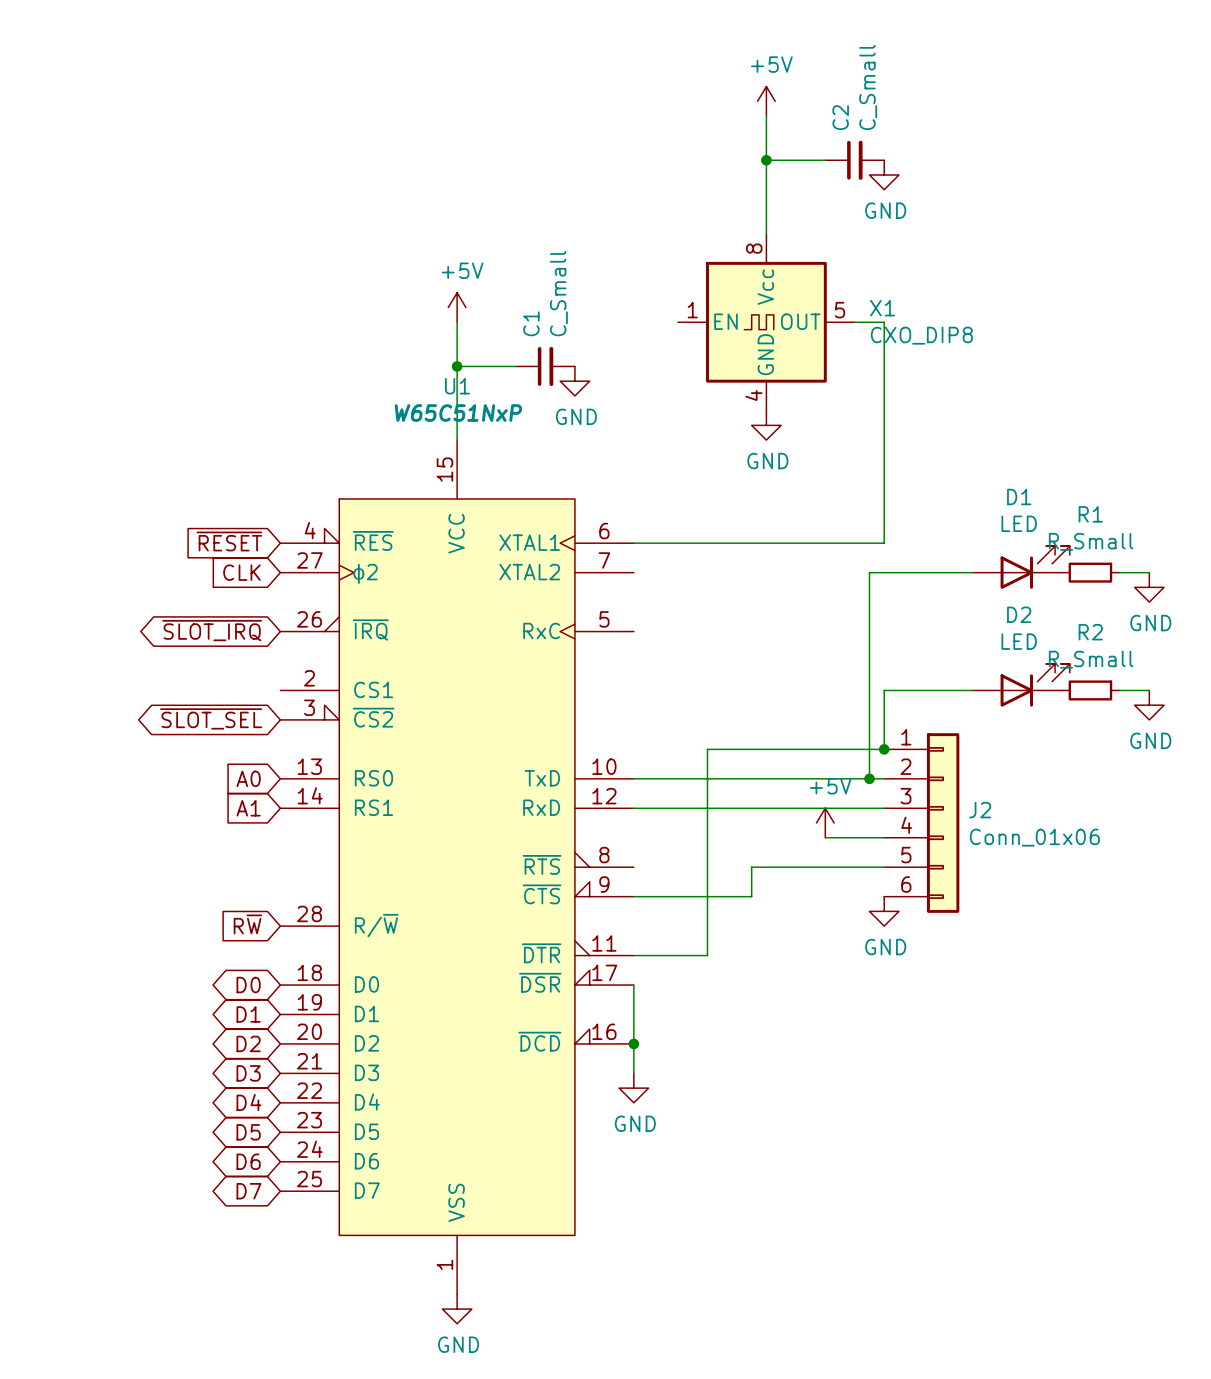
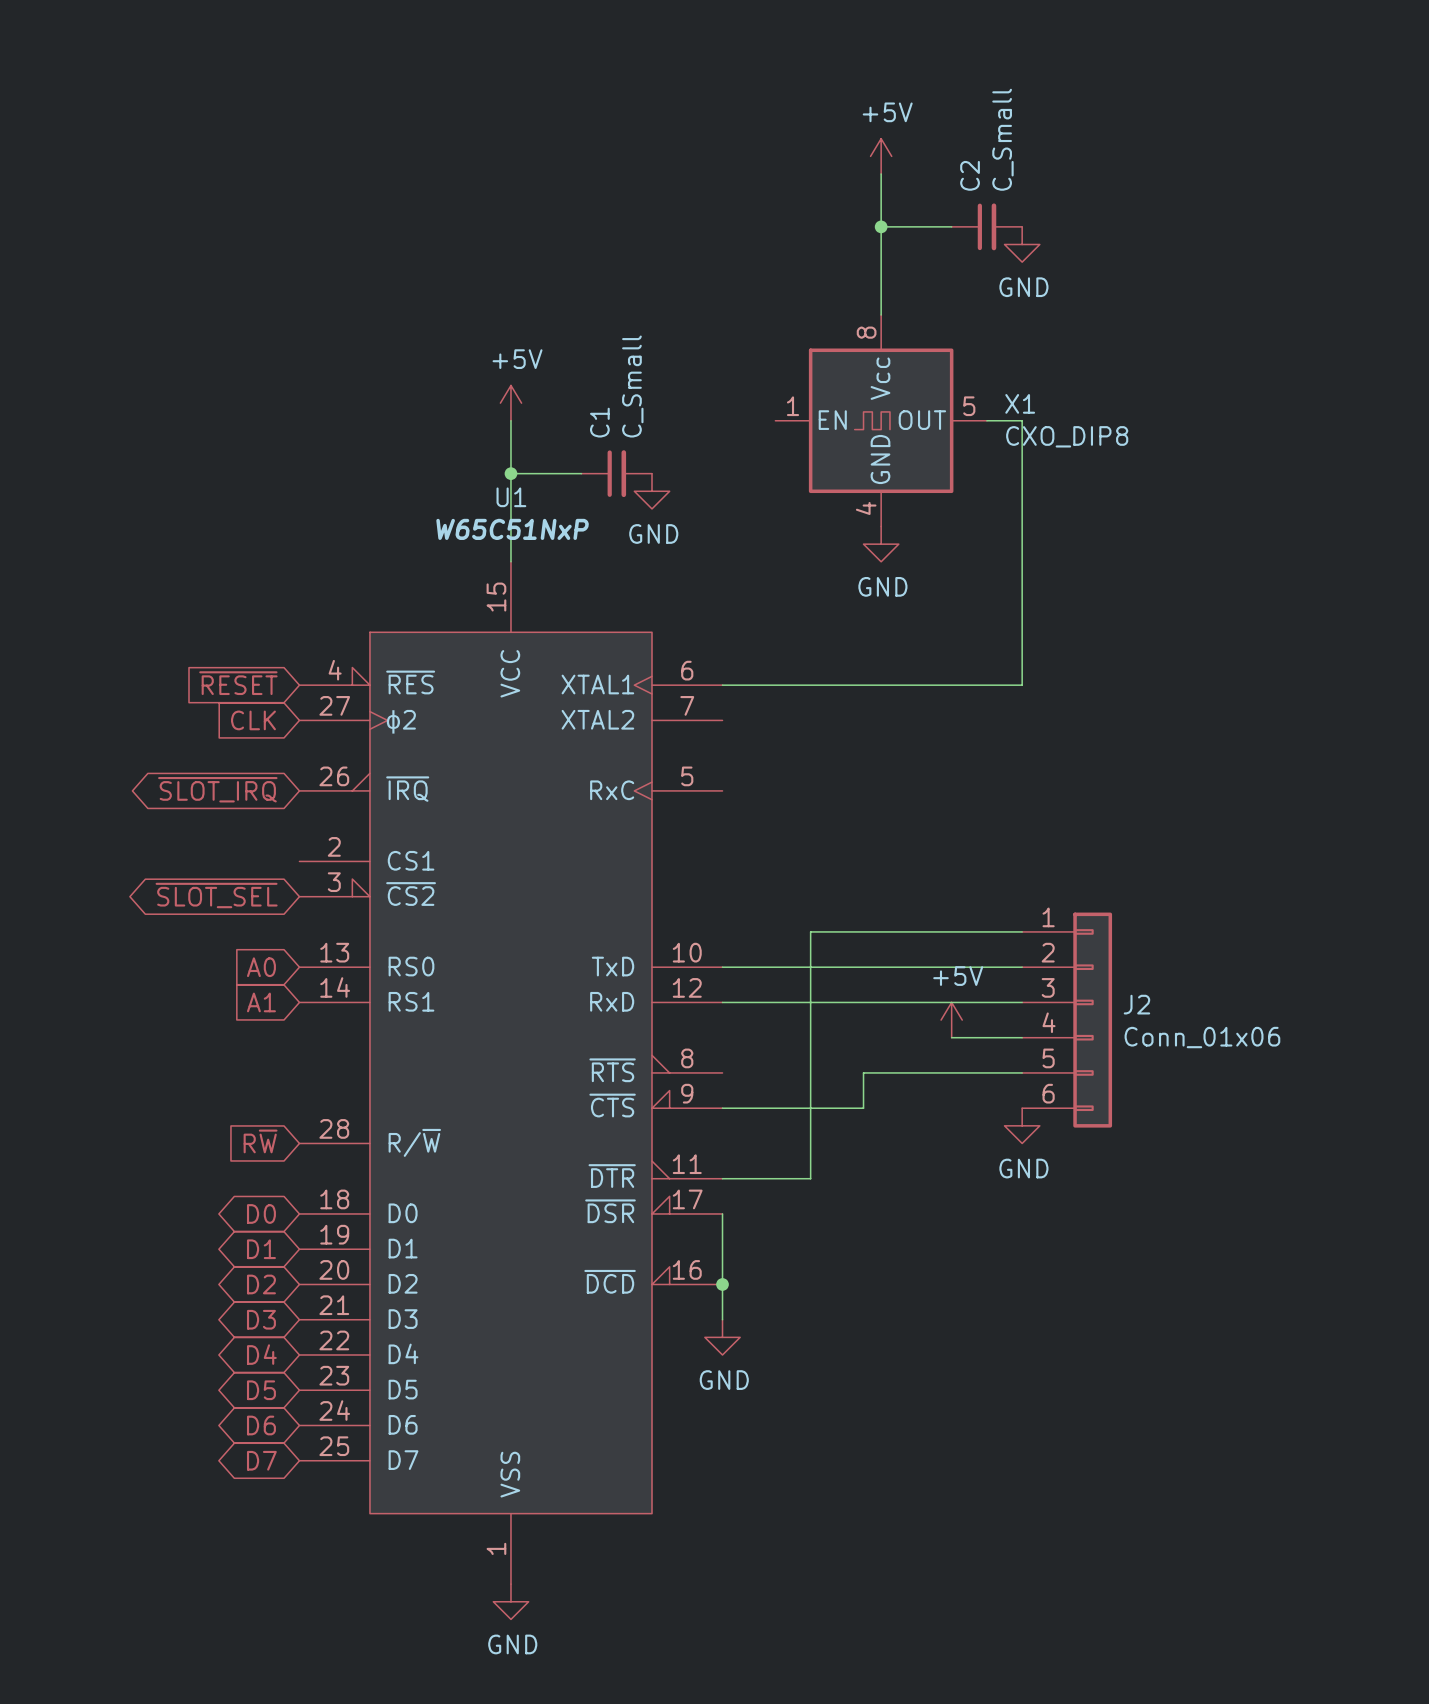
D1: LED (1021, 567) -> none
wire: (972, 572) (869, 572) (869, 778) -> none
R1: R_Small (1090, 572) -> none
wire: (1119, 572) (1149, 572) -> none
power symbol: GND (1149, 587) -> none
D2: LED (1021, 685) -> none
wire: (972, 690) (884, 690) (884, 749) -> none
R2: R_Small (1090, 690) -> none
wire: (1119, 690) (1149, 690) -> none
power symbol: GND (1149, 705) -> none
junction: (884, 749) -> none
junction: (869, 778) -> none

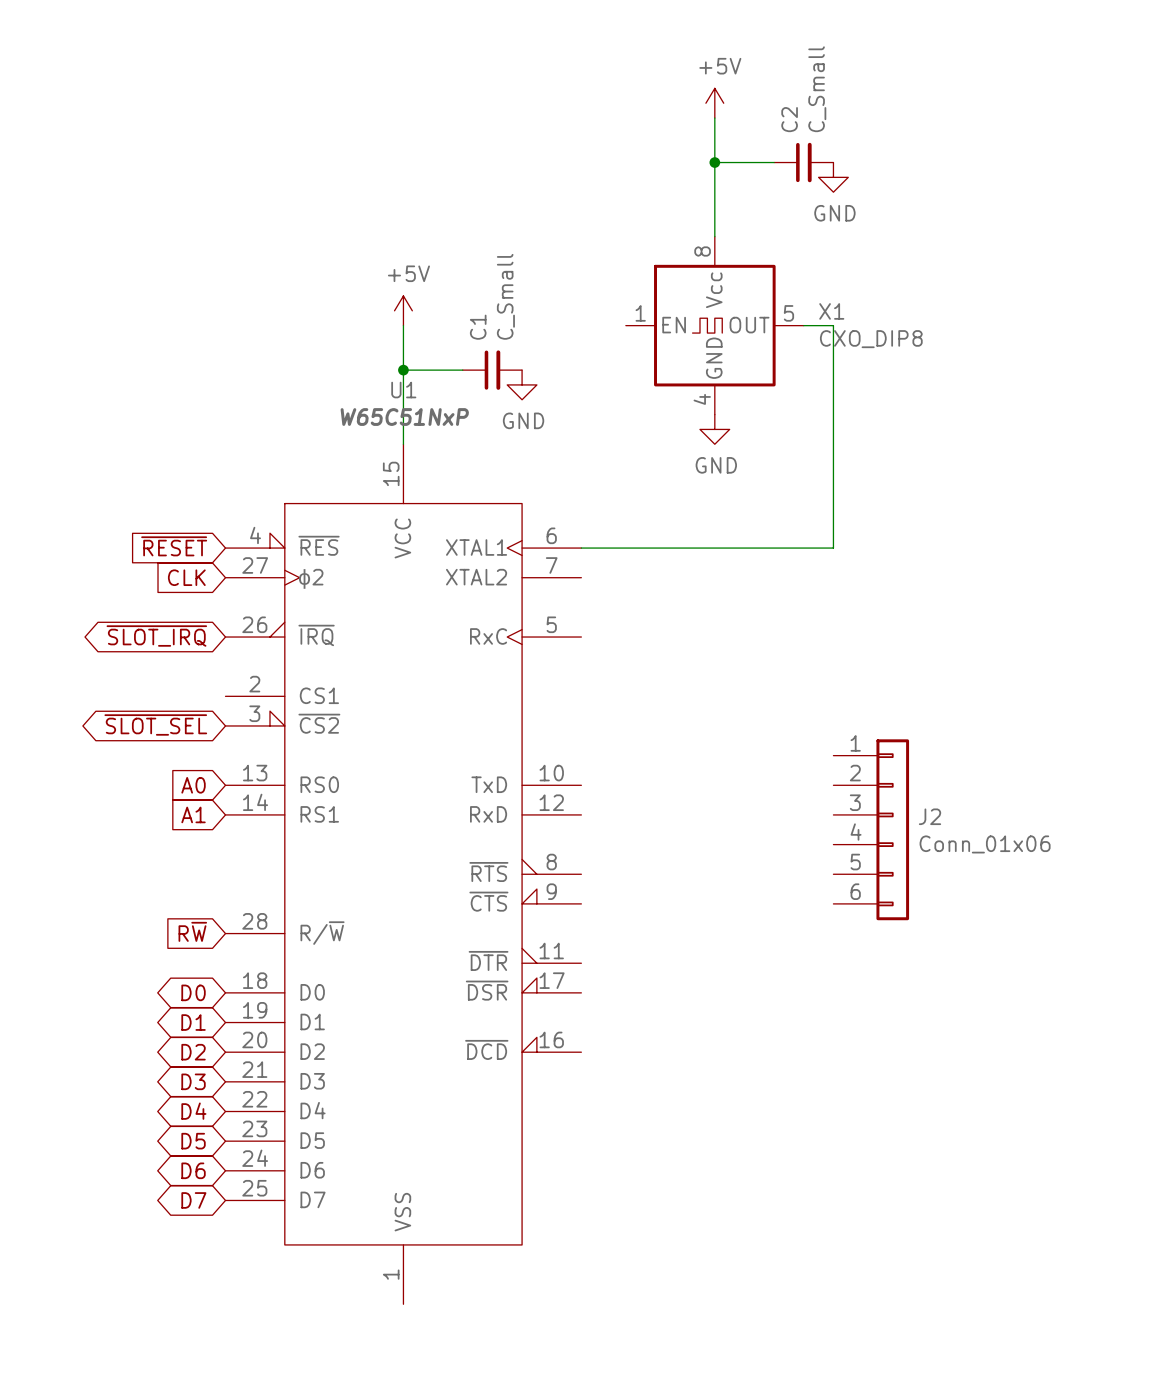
wire: (1022, 931) (810, 931) (810, 1178) (722, 1178) -> none
wire: (722, 967) (1022, 967) -> none
wire: (722, 1002) (1022, 1002) -> none
power symbol: +5V (951, 1020) -> none
wire: (951, 1037) (1022, 1037) -> none
wire: (1022, 1072) (863, 1072) (863, 1108) (722, 1108) -> none
power symbol: GND (1022, 1125) -> none
wire: (722, 1213) (722, 1319) -> none
junction: (722, 1284) -> none
power symbol: GND (722, 1337) -> none
power symbol: GND (510, 1601) -> none

